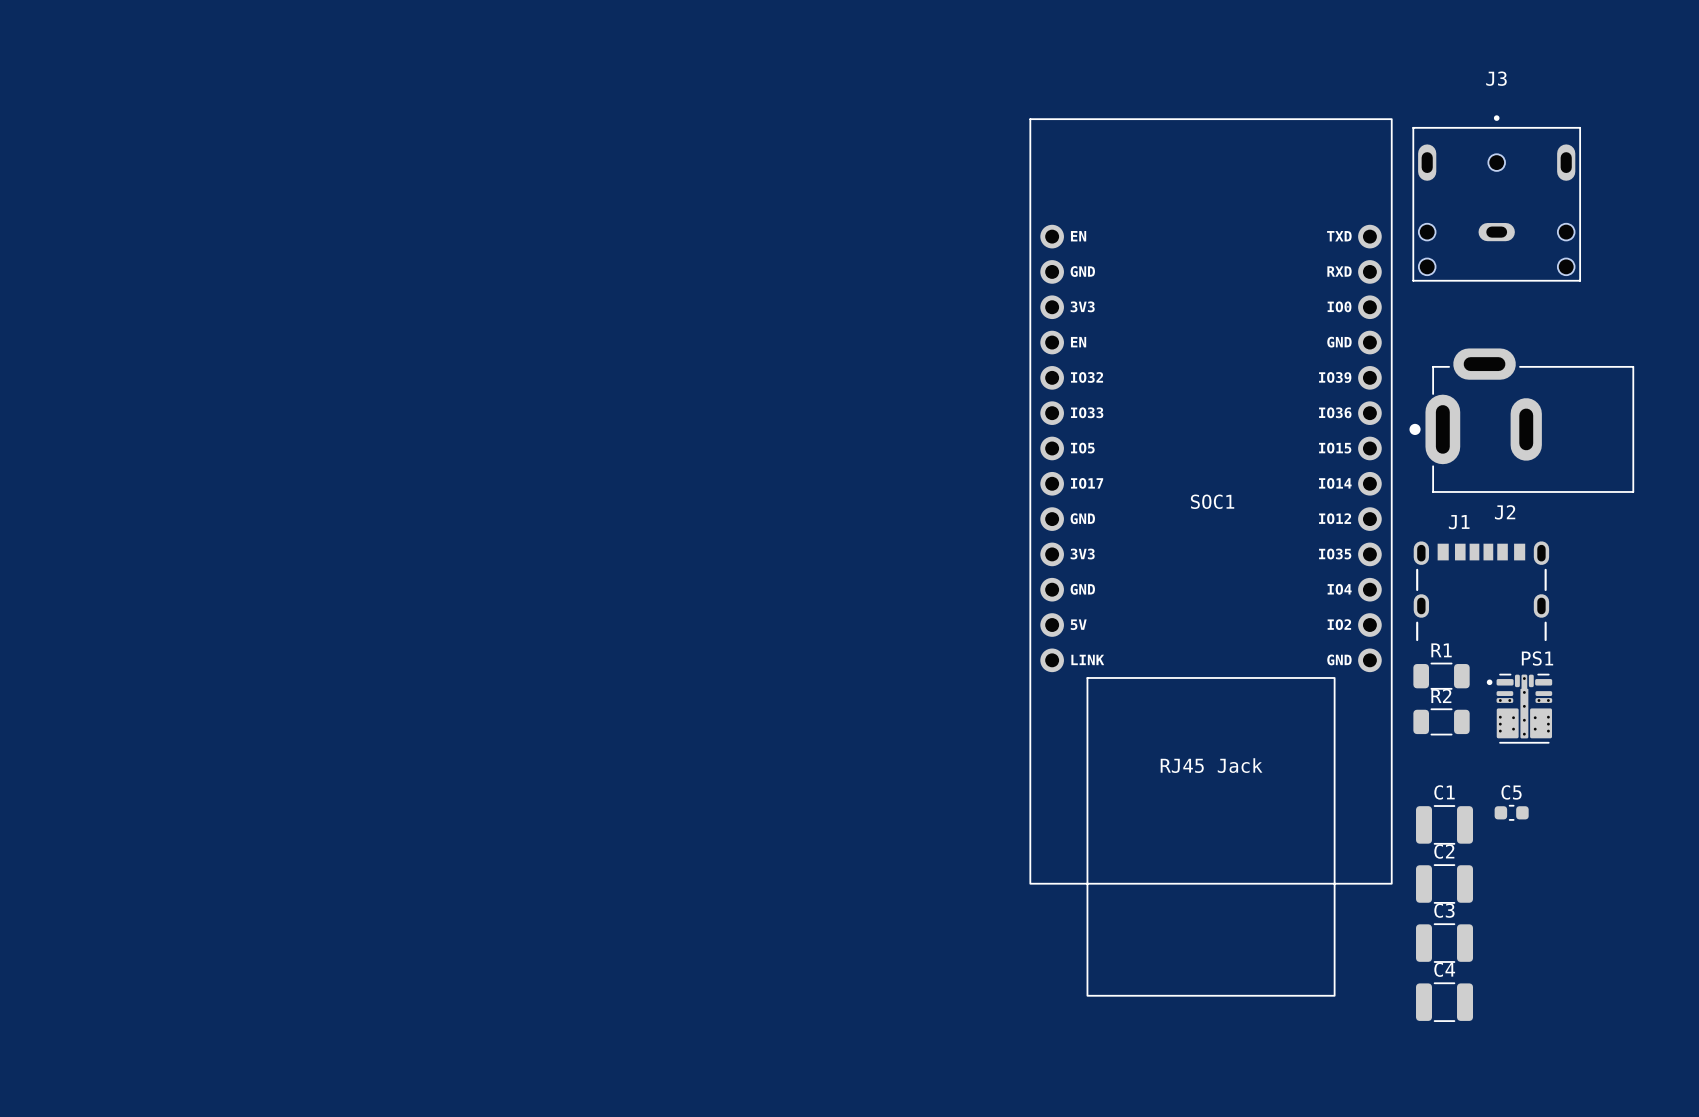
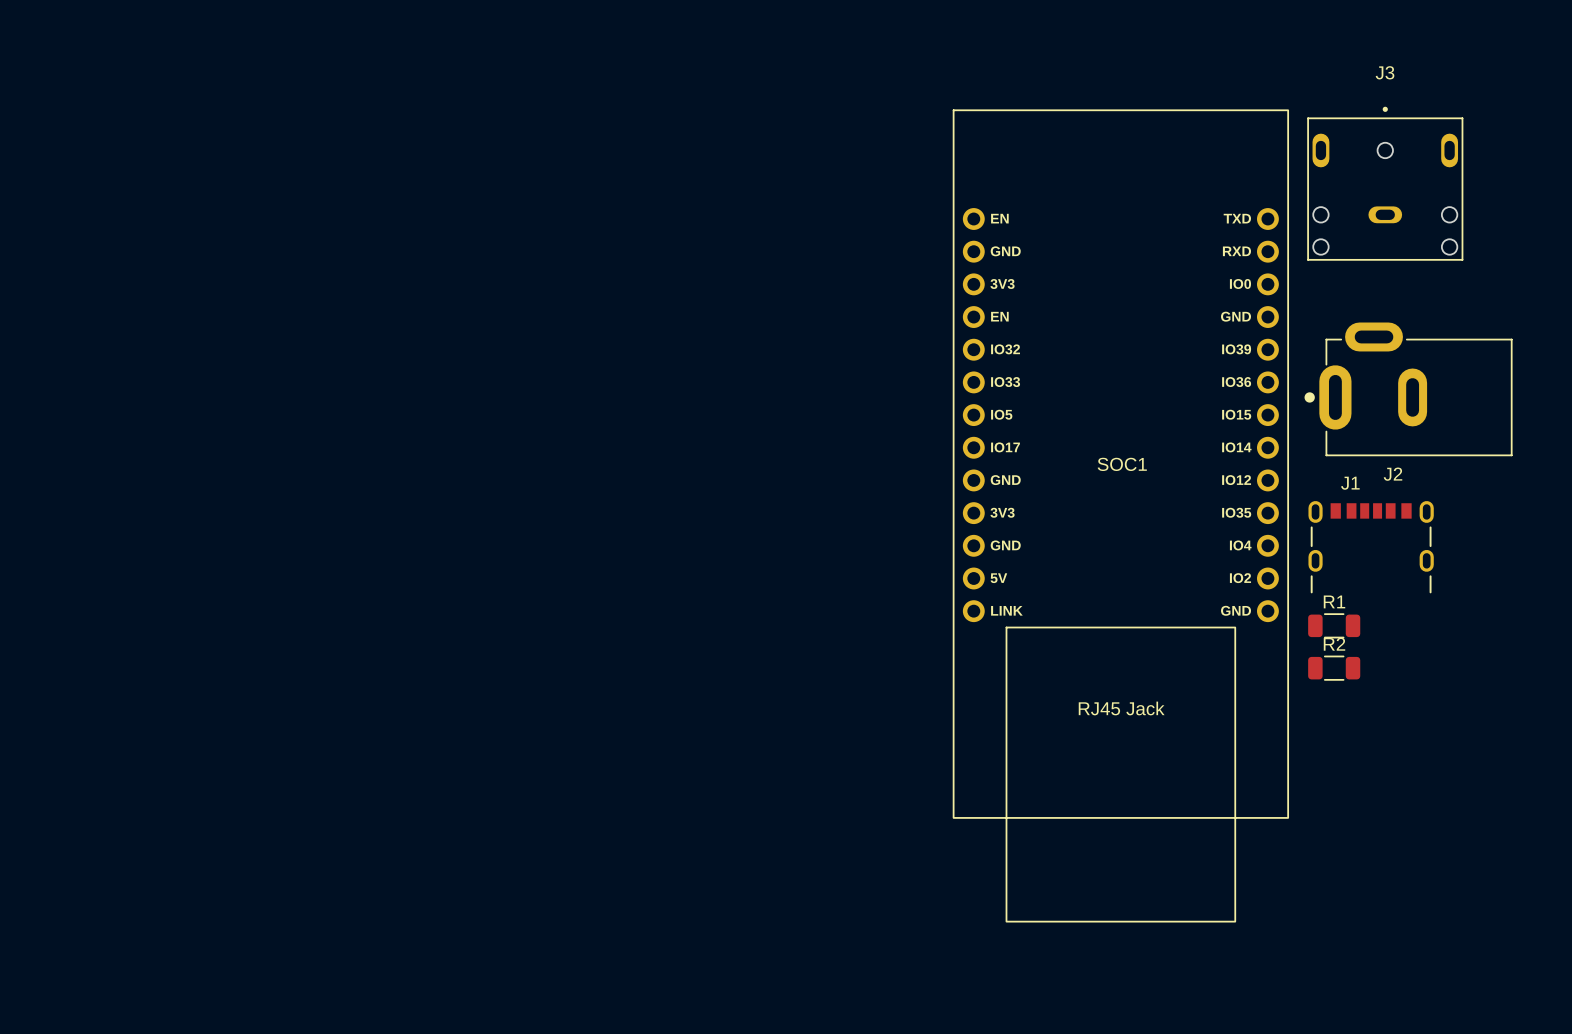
PS1: (1519, 708) -> none
C5: (1511, 812) -> none
C1: (1444, 824) -> none
C2: (1444, 884) -> none
C3: (1444, 943) -> none
C4: (1444, 1002) -> none

